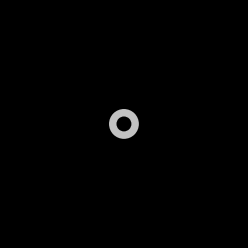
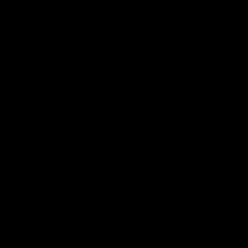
via: (123, 123) -> none

